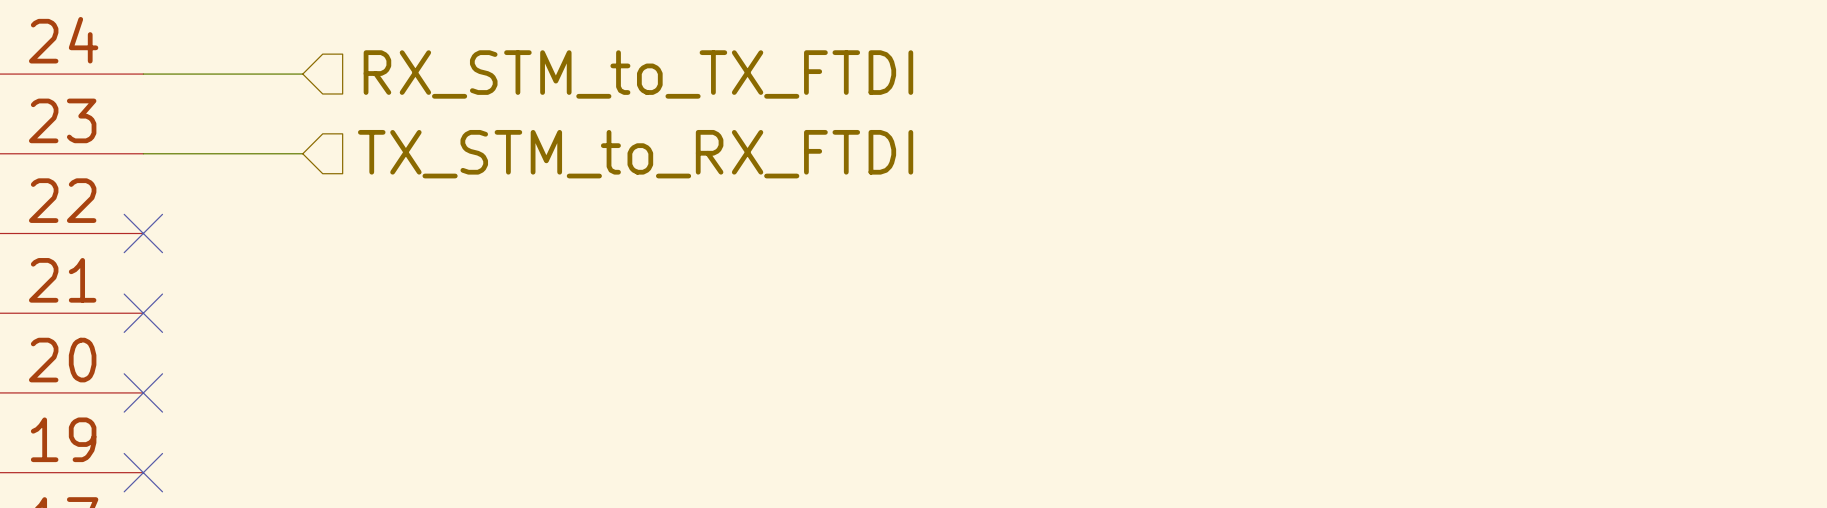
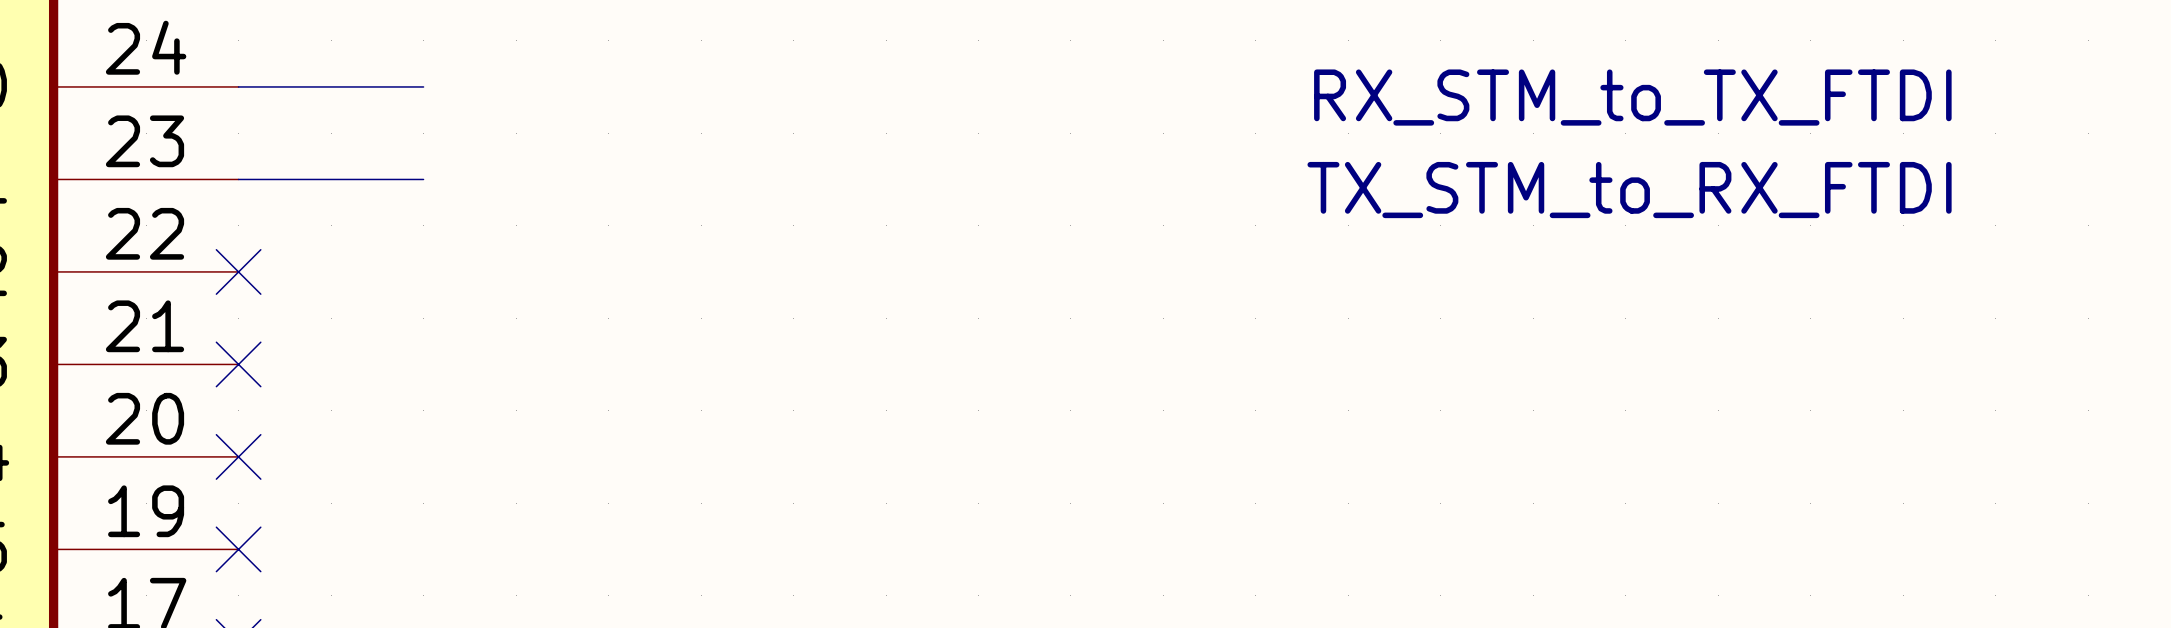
hierarchical label: RX_STM_to_TX_FTDI (638, 74) -> none
text: none -> RX_STM_to_TX_FTDI (1632, 97)
hierarchical label: TX_STM_to_RX_FTDI (635, 154) -> none
text: none -> TX_STM_to_RX_FTDI (1629, 190)

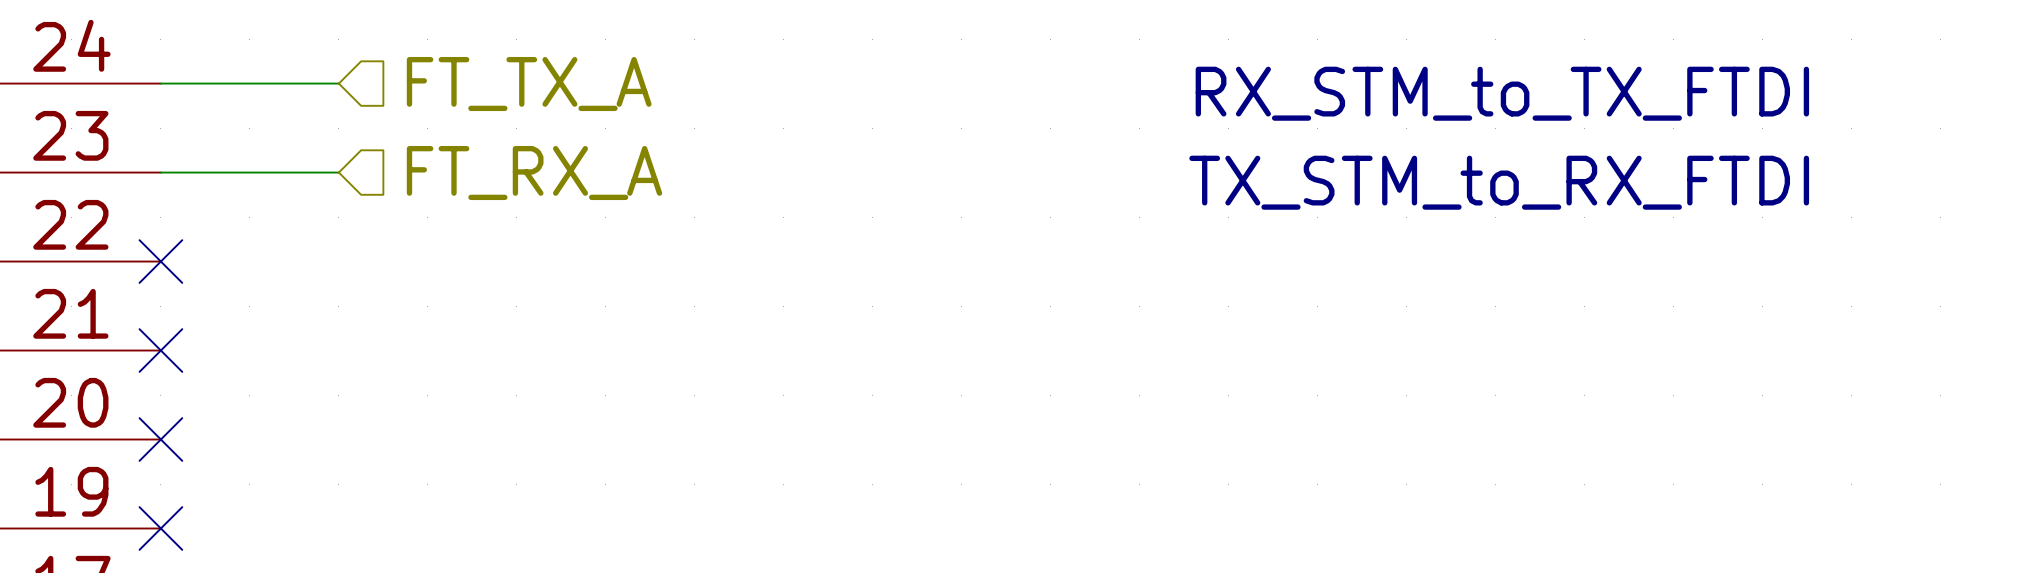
hierarchical label: none -> FT_TX_A (529, 84)
hierarchical label: none -> FT_RX_A (534, 173)

